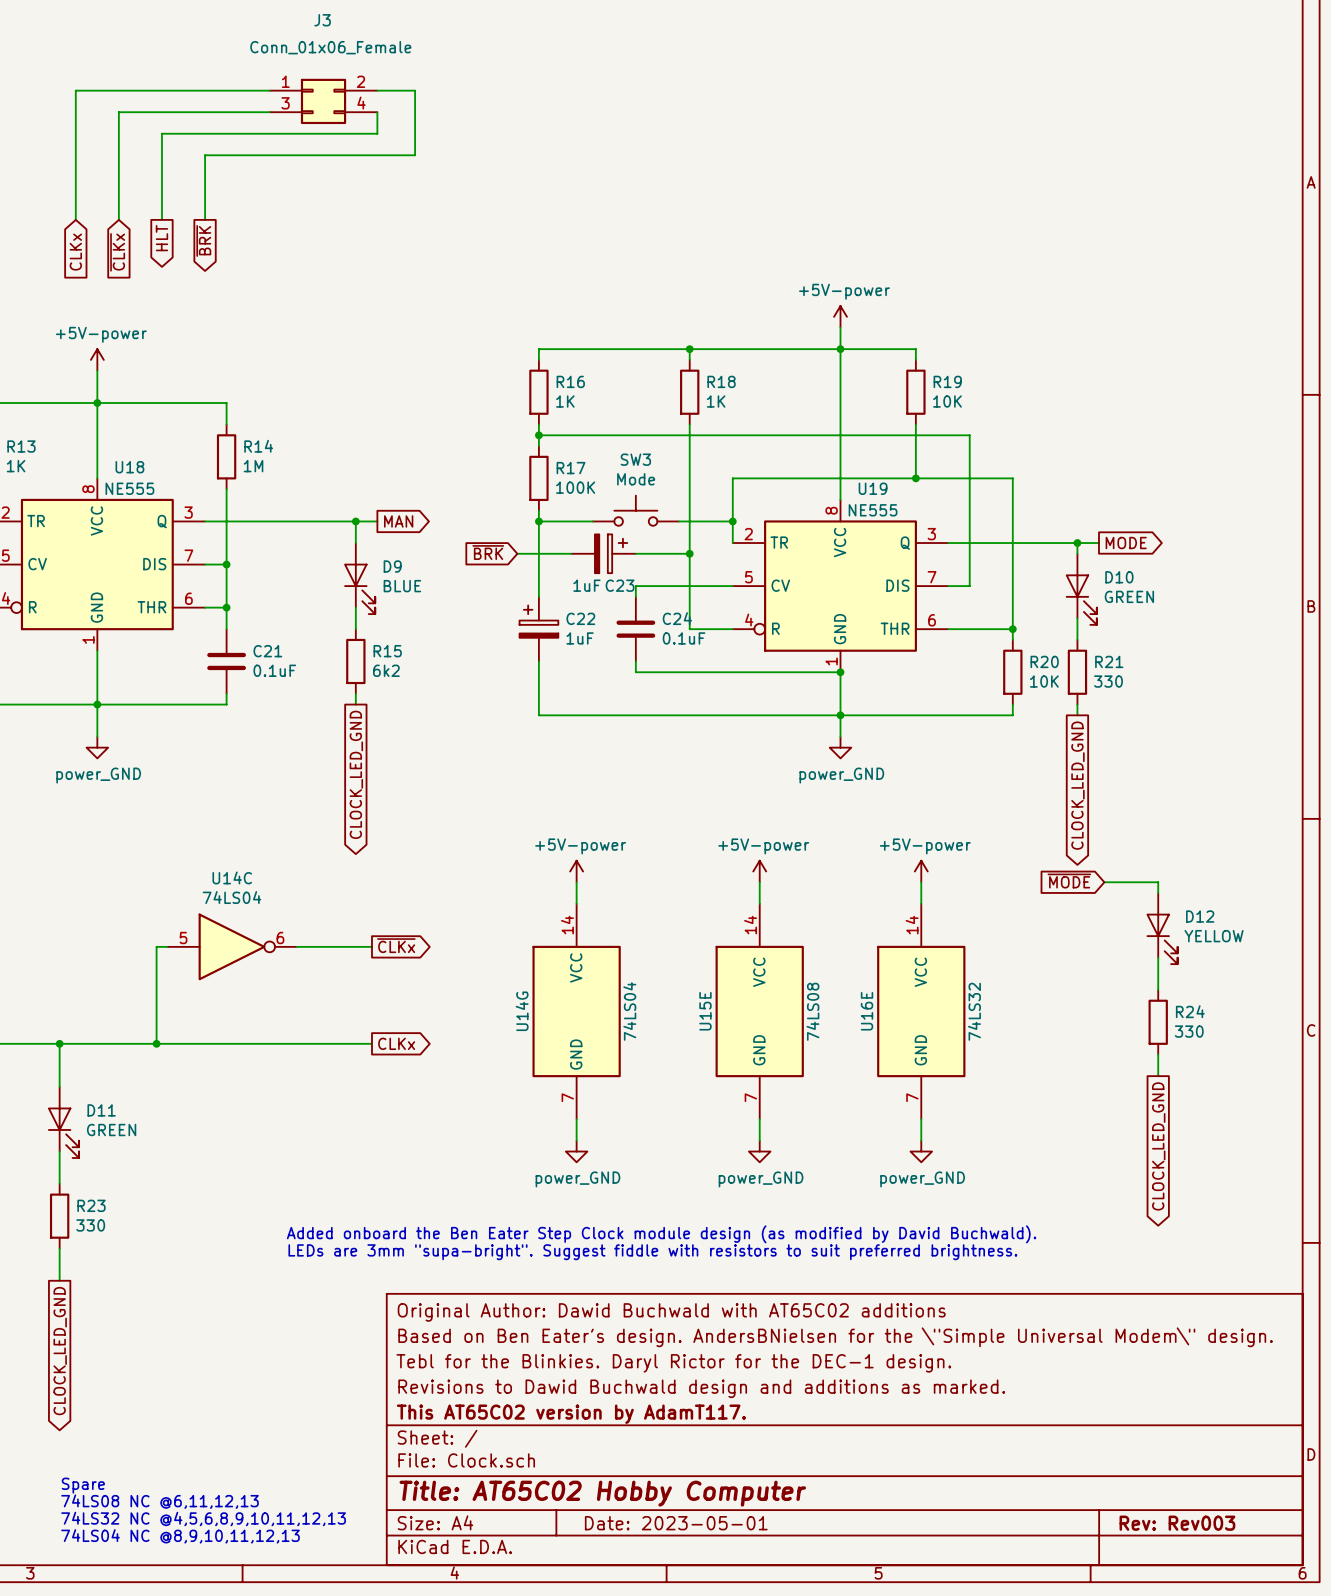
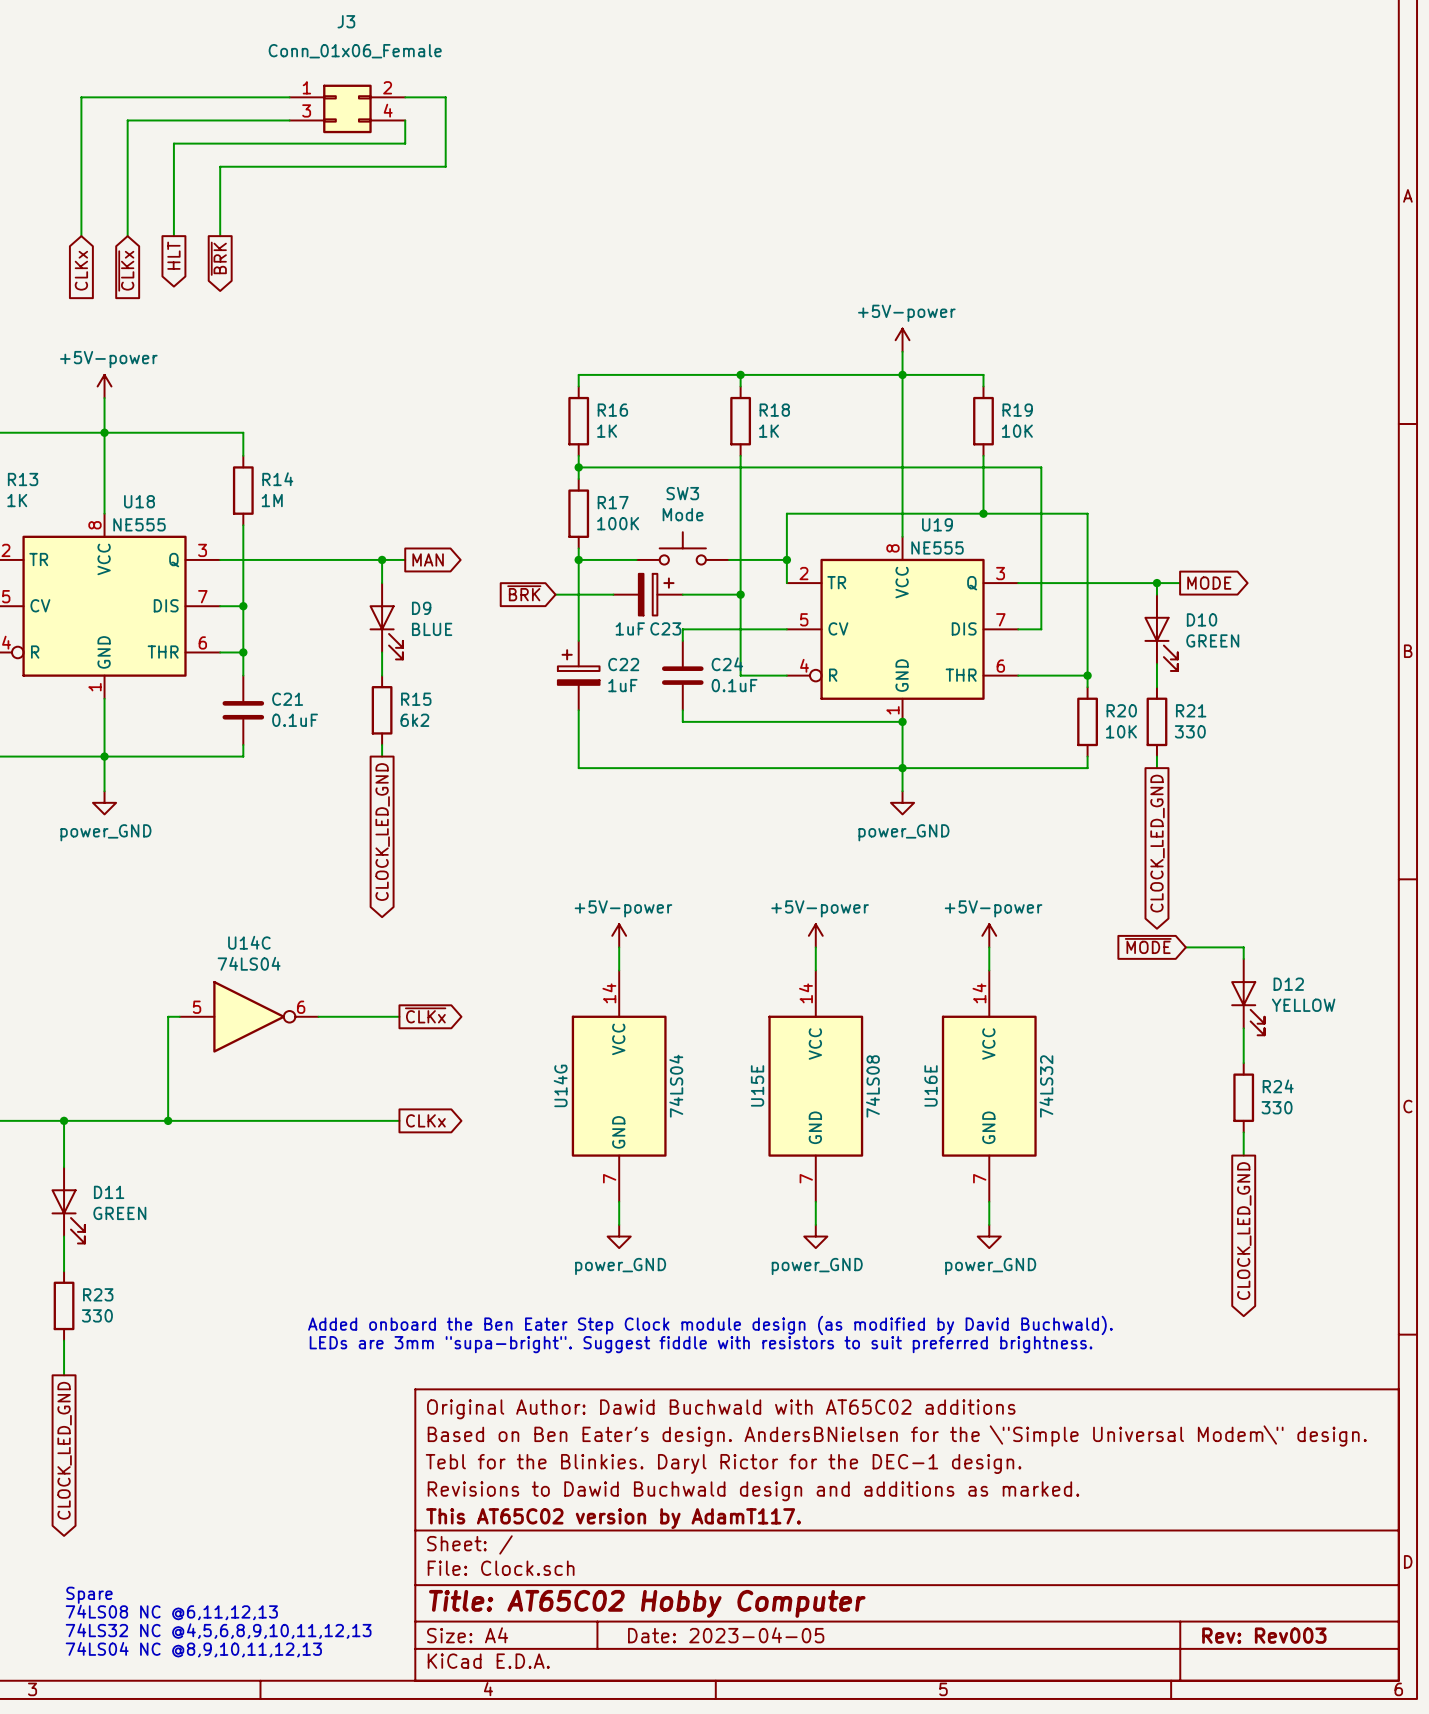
title block: Date: 2023-05-01 (676, 1523) -> Date: 2023-04-05 (726, 1635)

